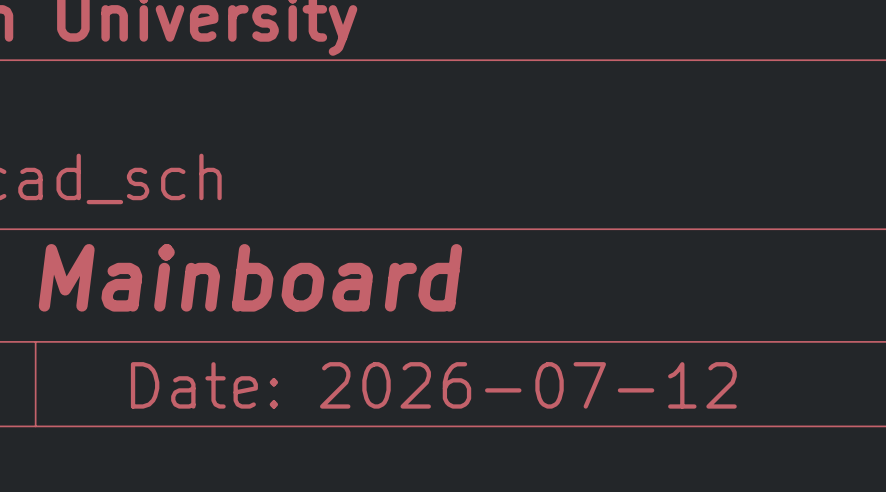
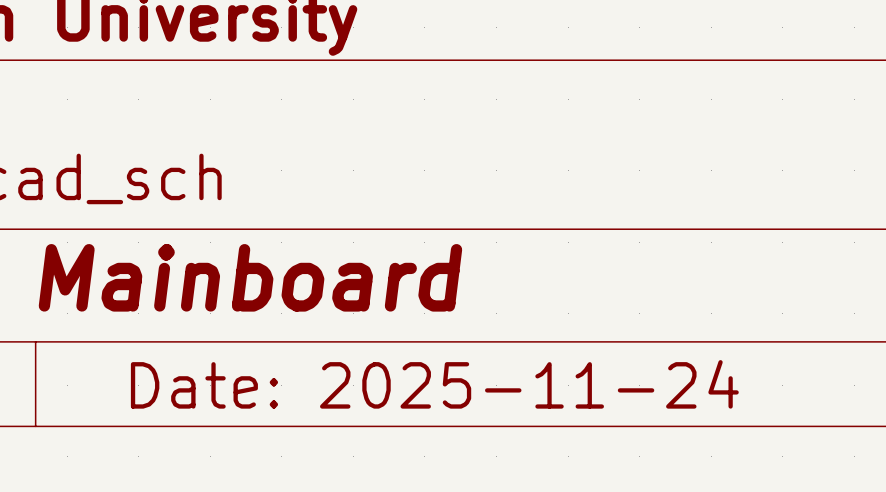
title block: Date: 2026-07-12 (433, 385) -> Date: 2025-11-24 (434, 384)

